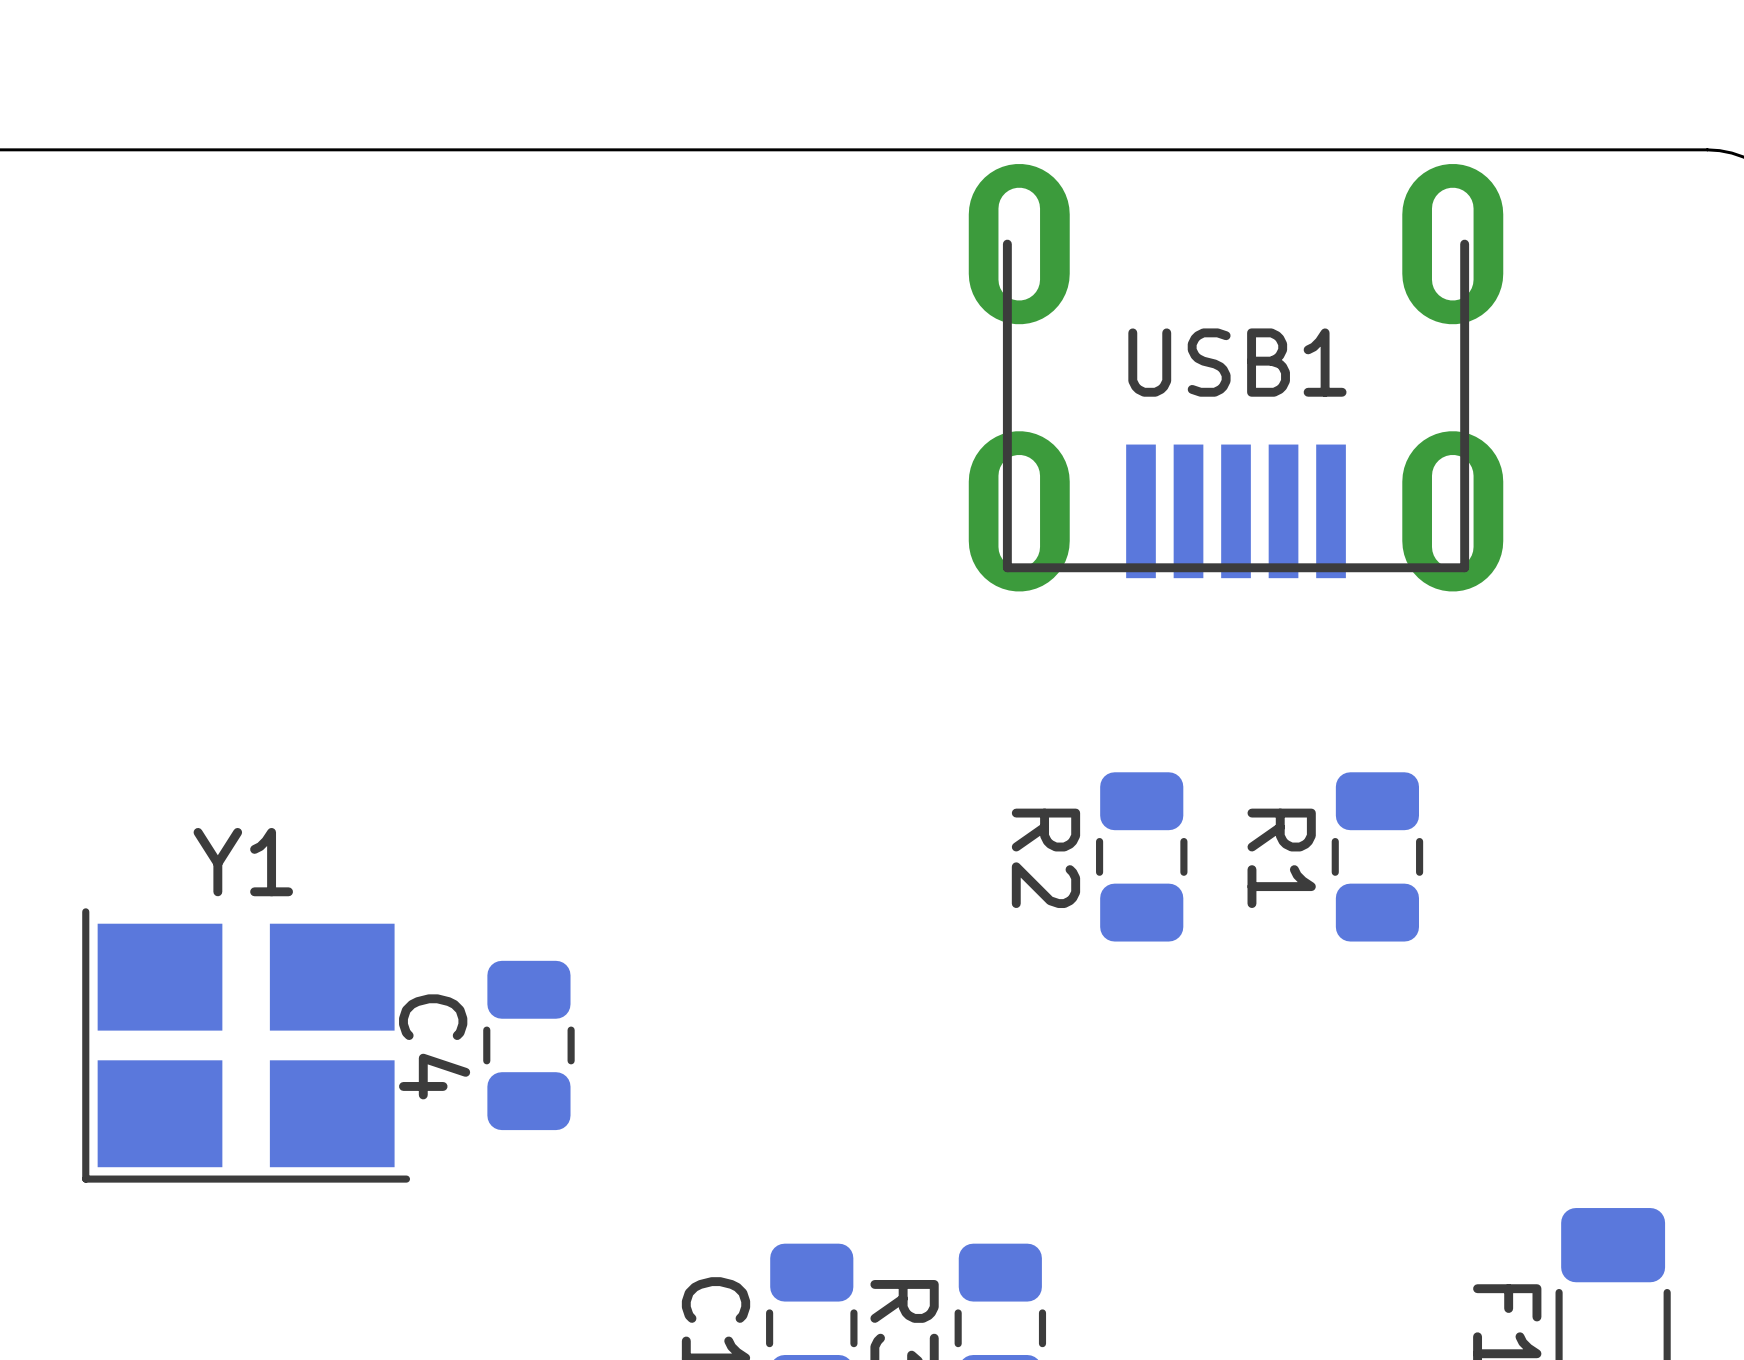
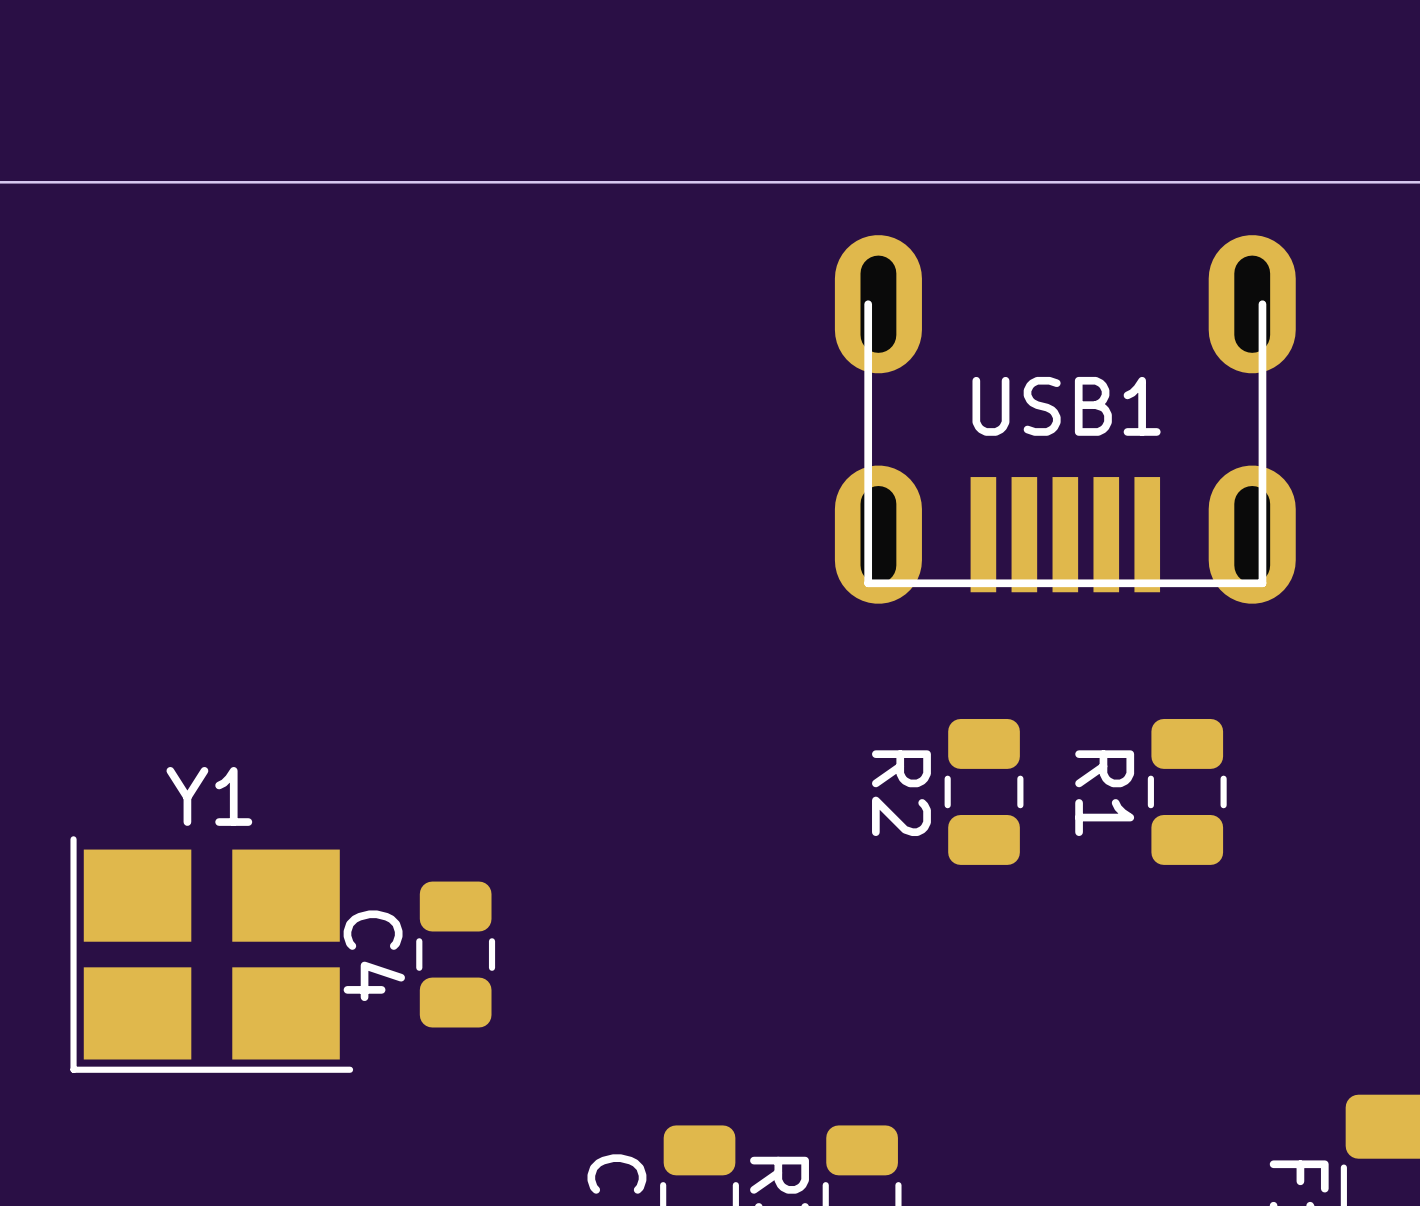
USB1 position: (1236, 377) -> (1065, 419)

